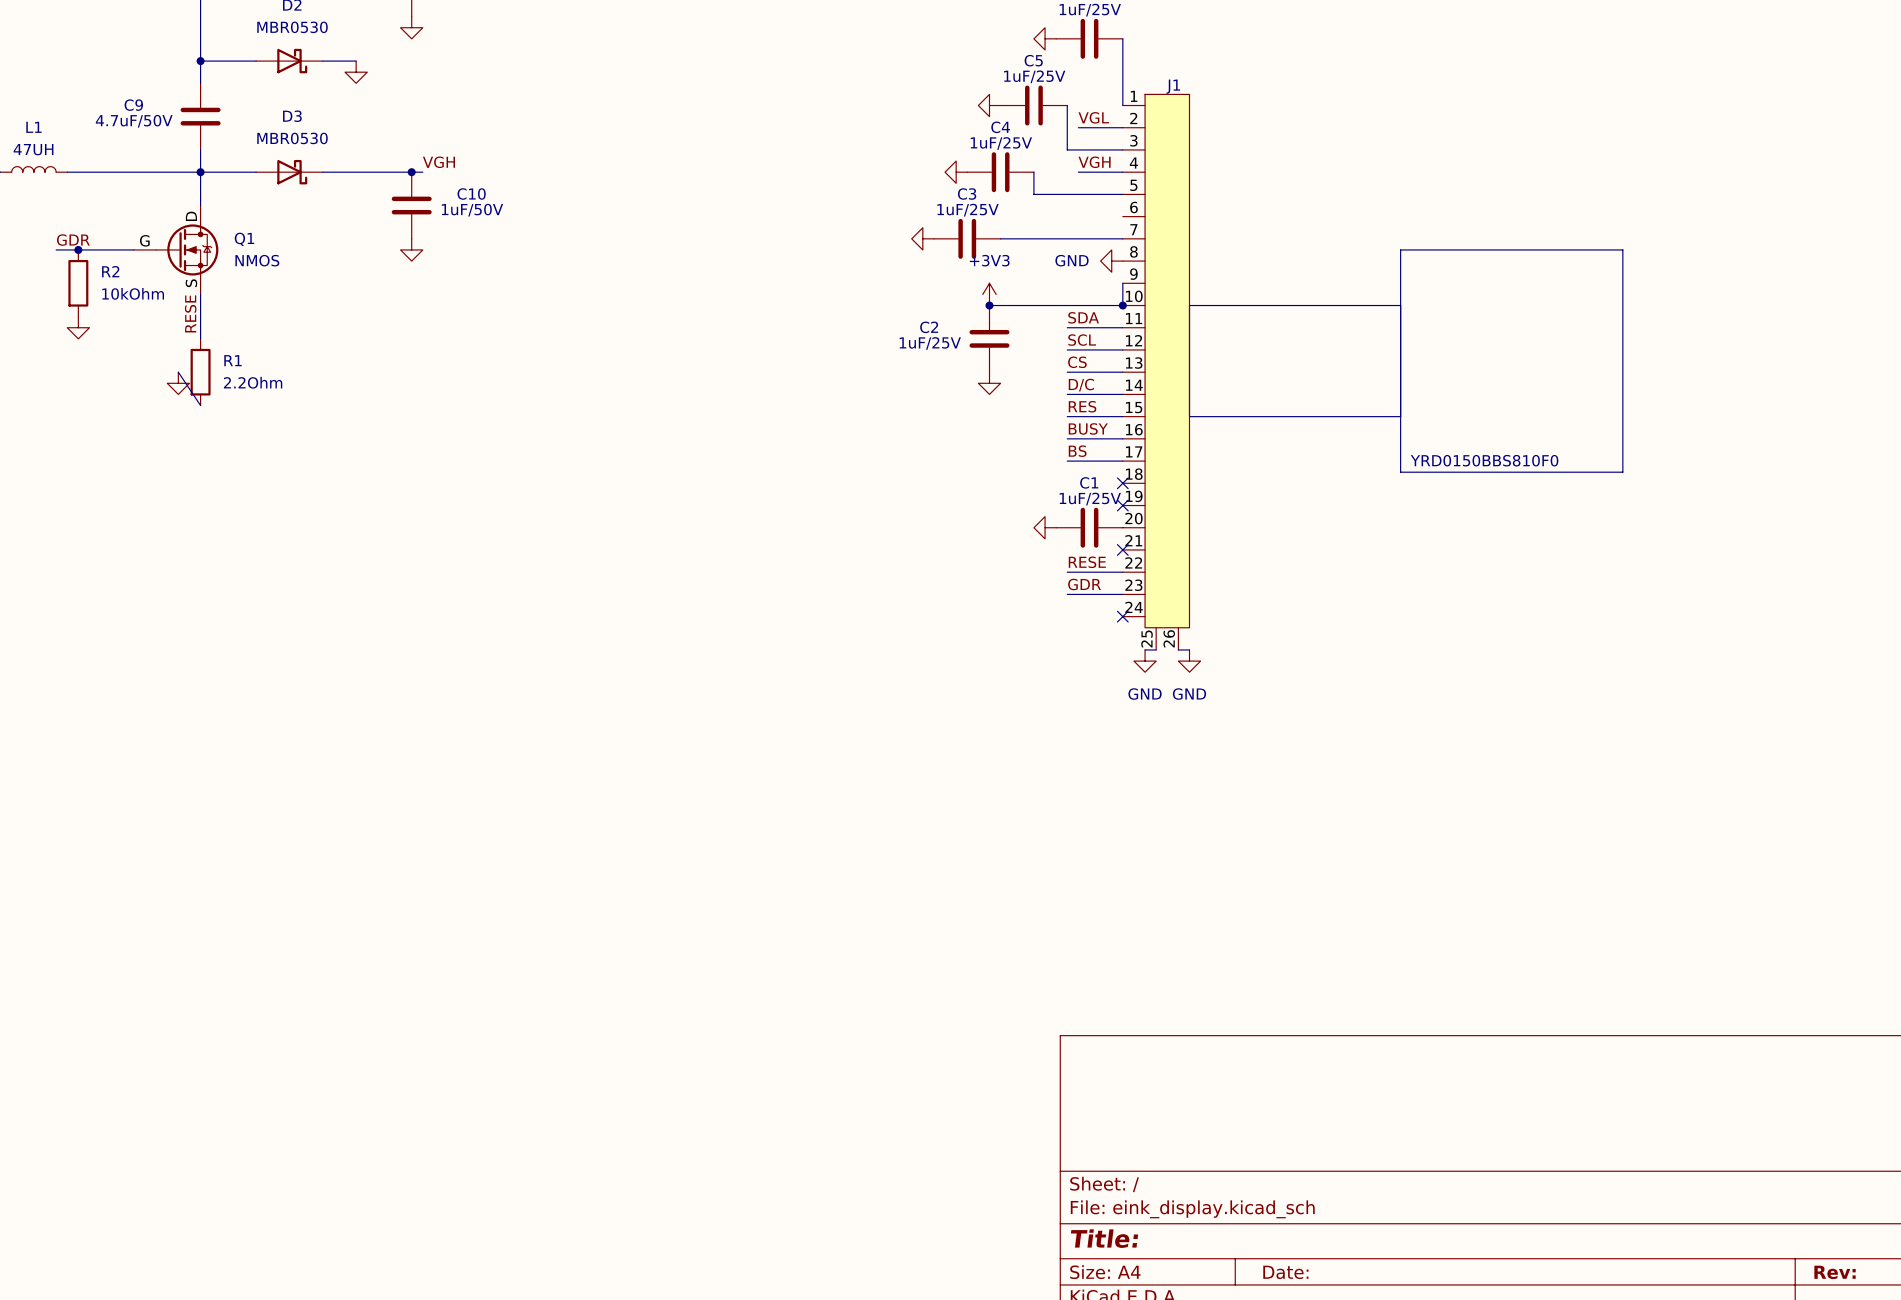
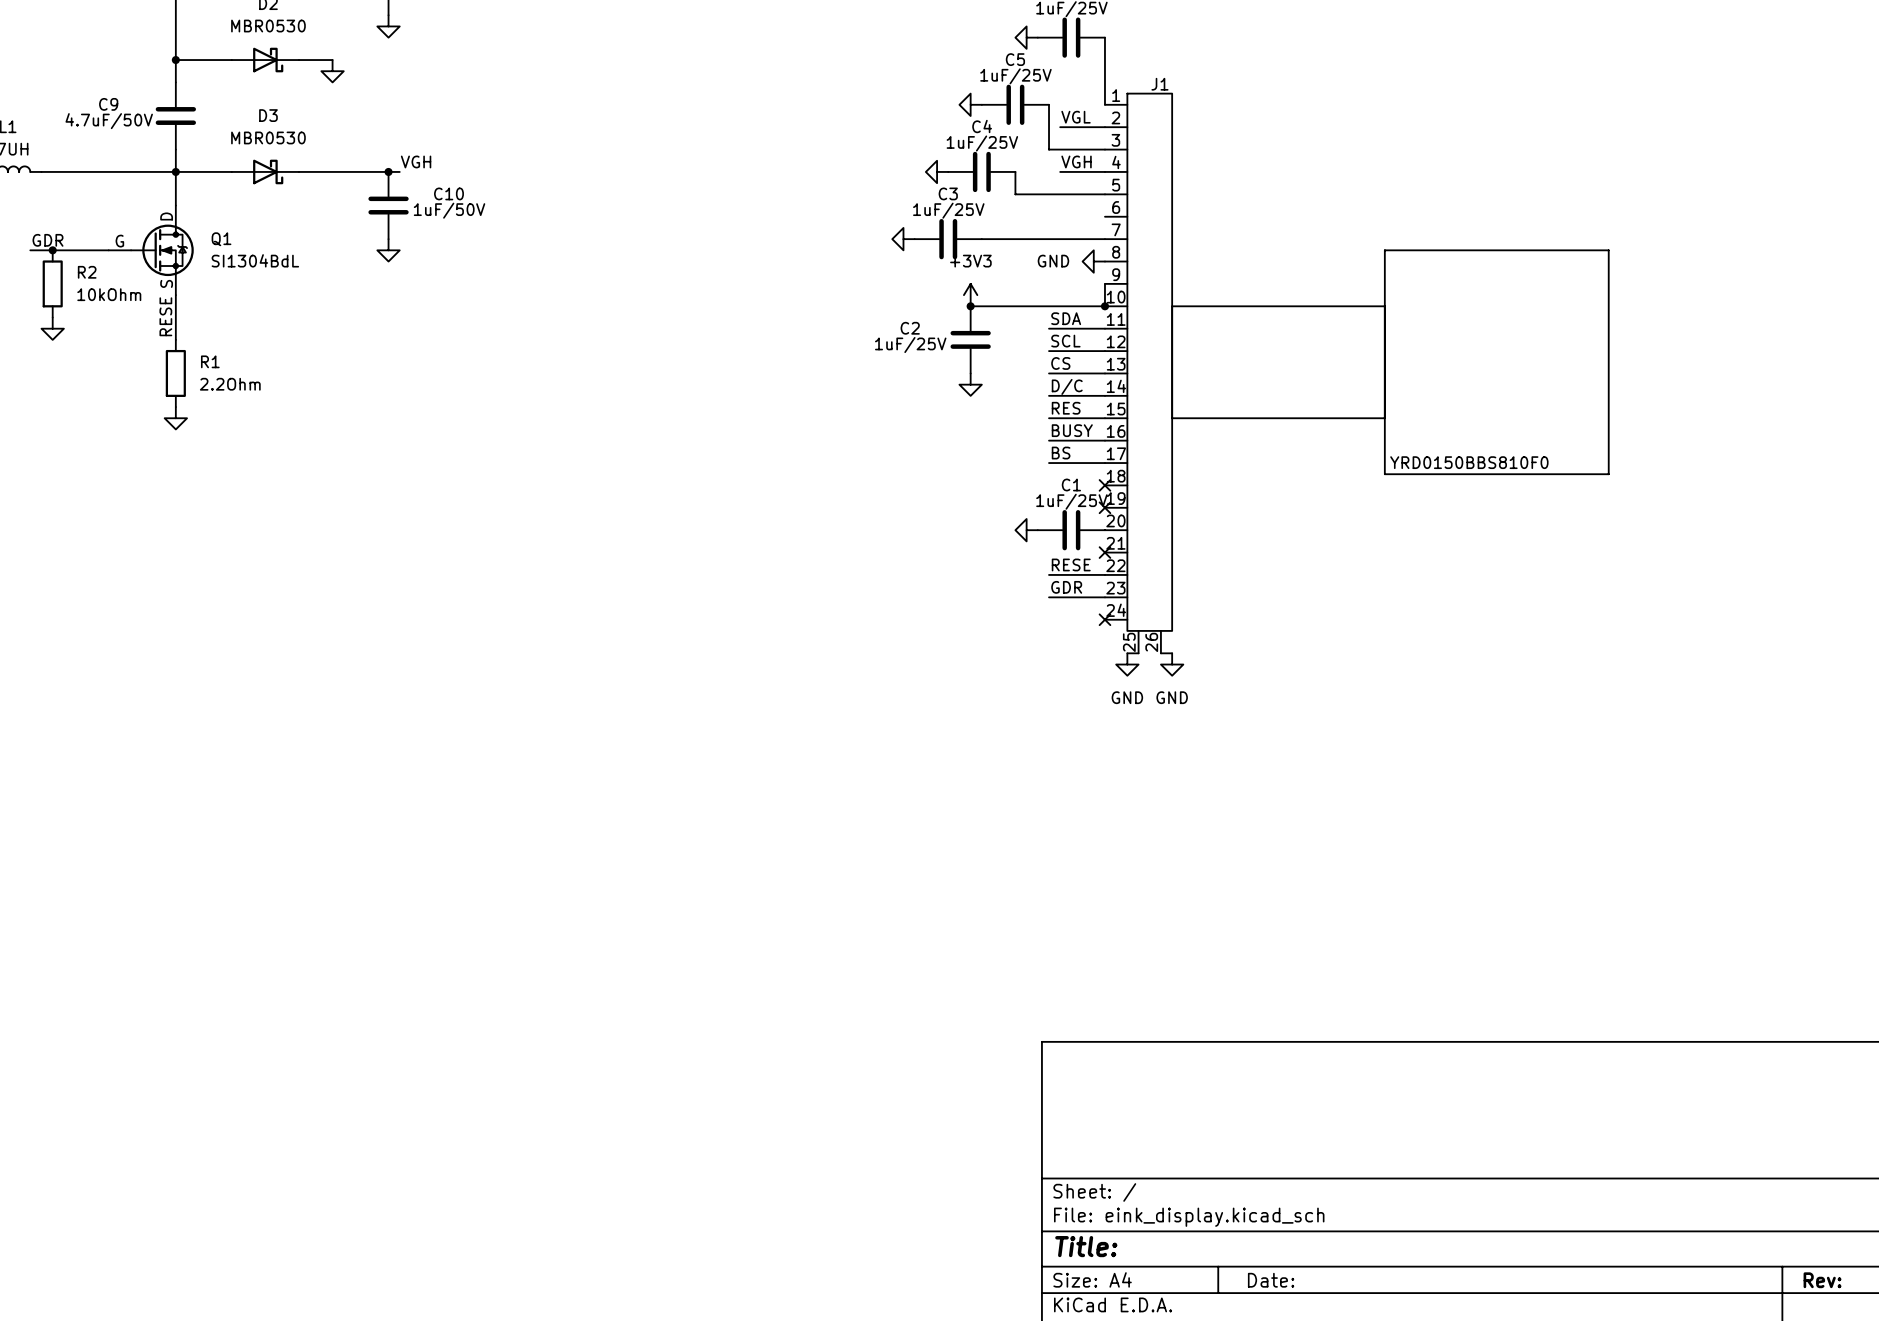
Q1 value: NMOS (257, 260) -> SI1304BdL (255, 260)
wire: (178, 372) (200, 405) -> none
power symbol position: (178, 383) -> (175, 418)

